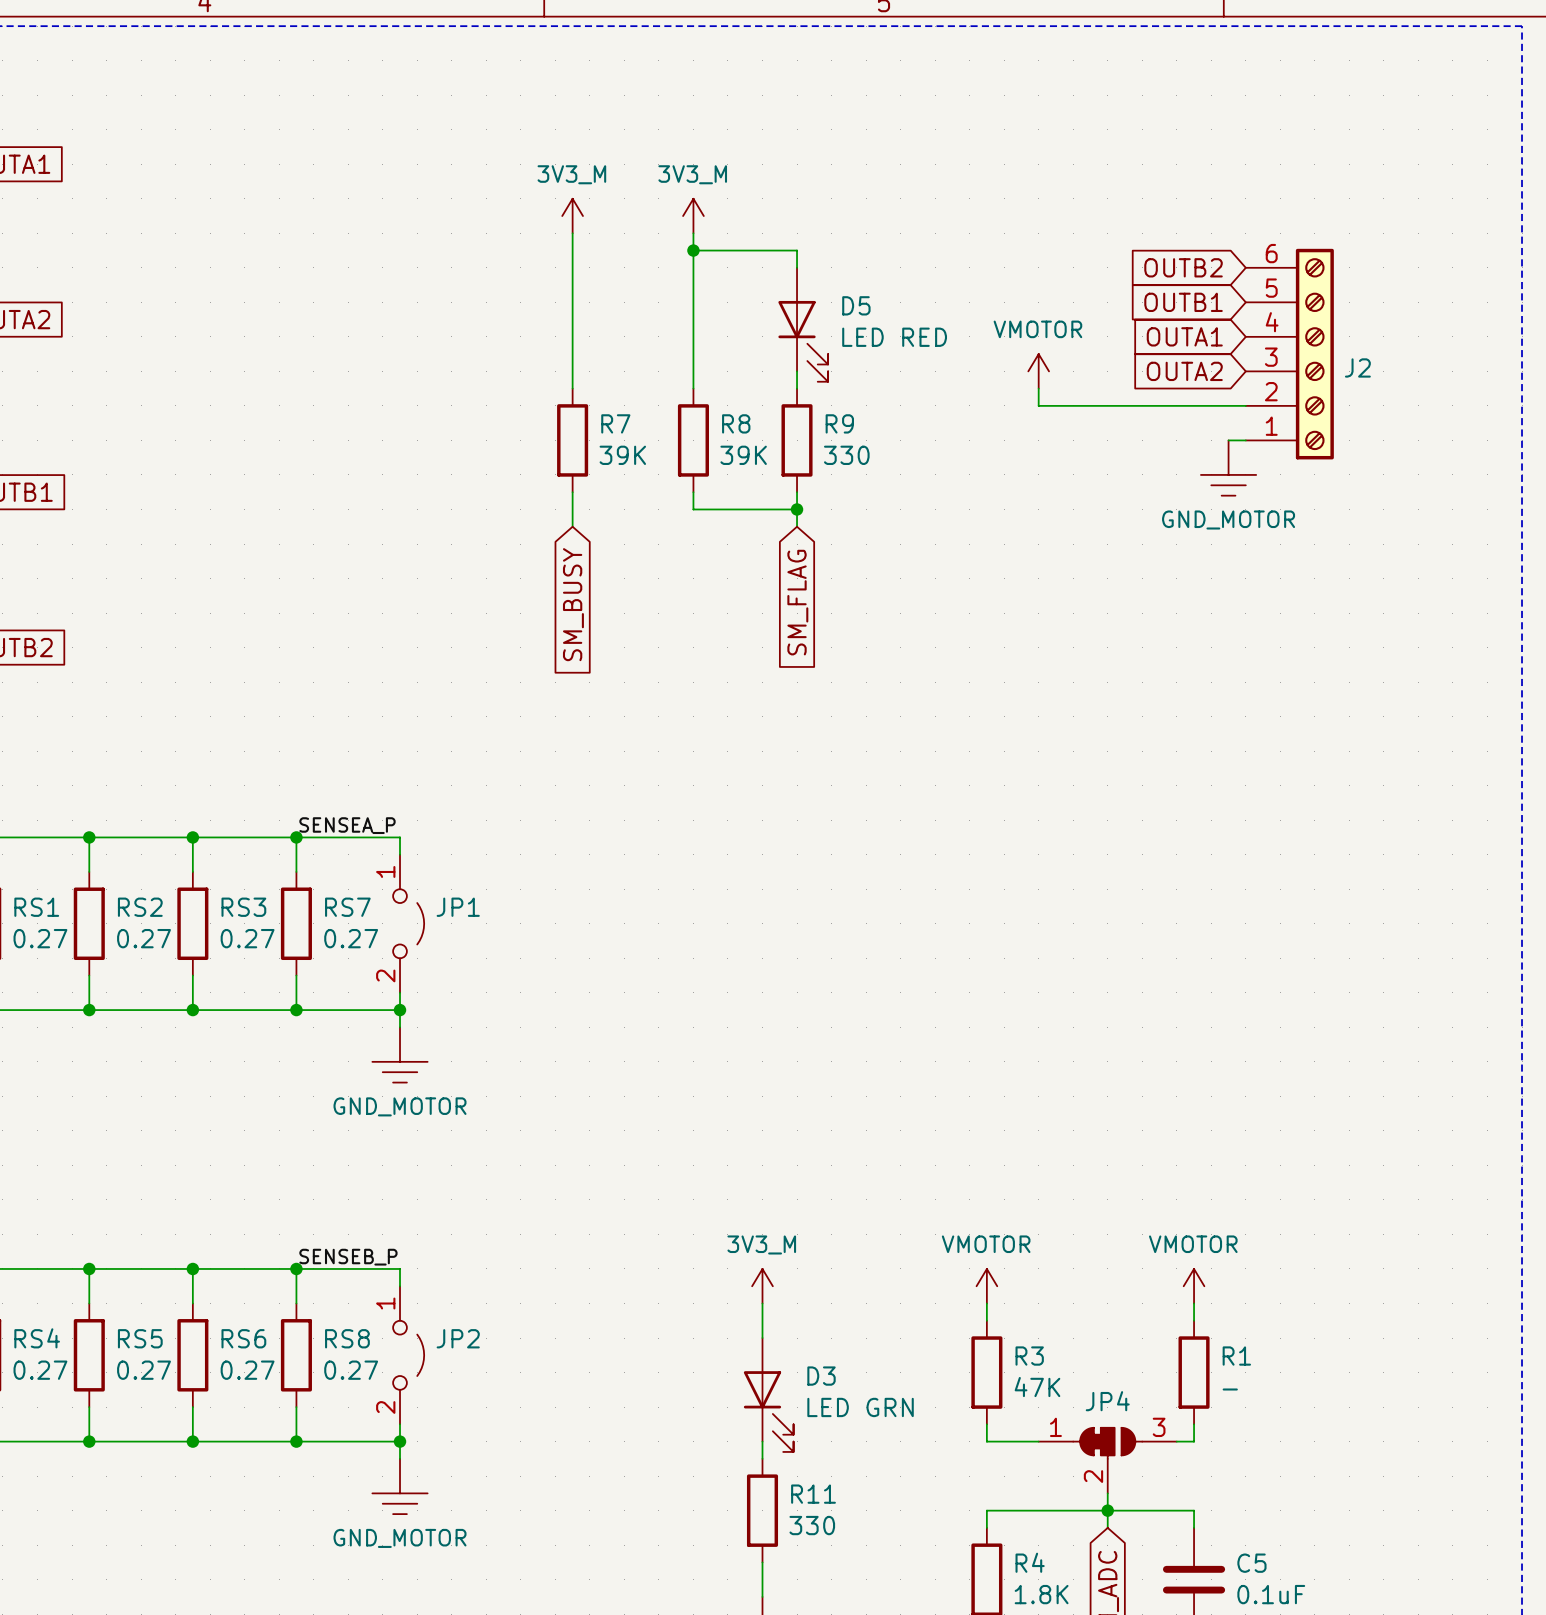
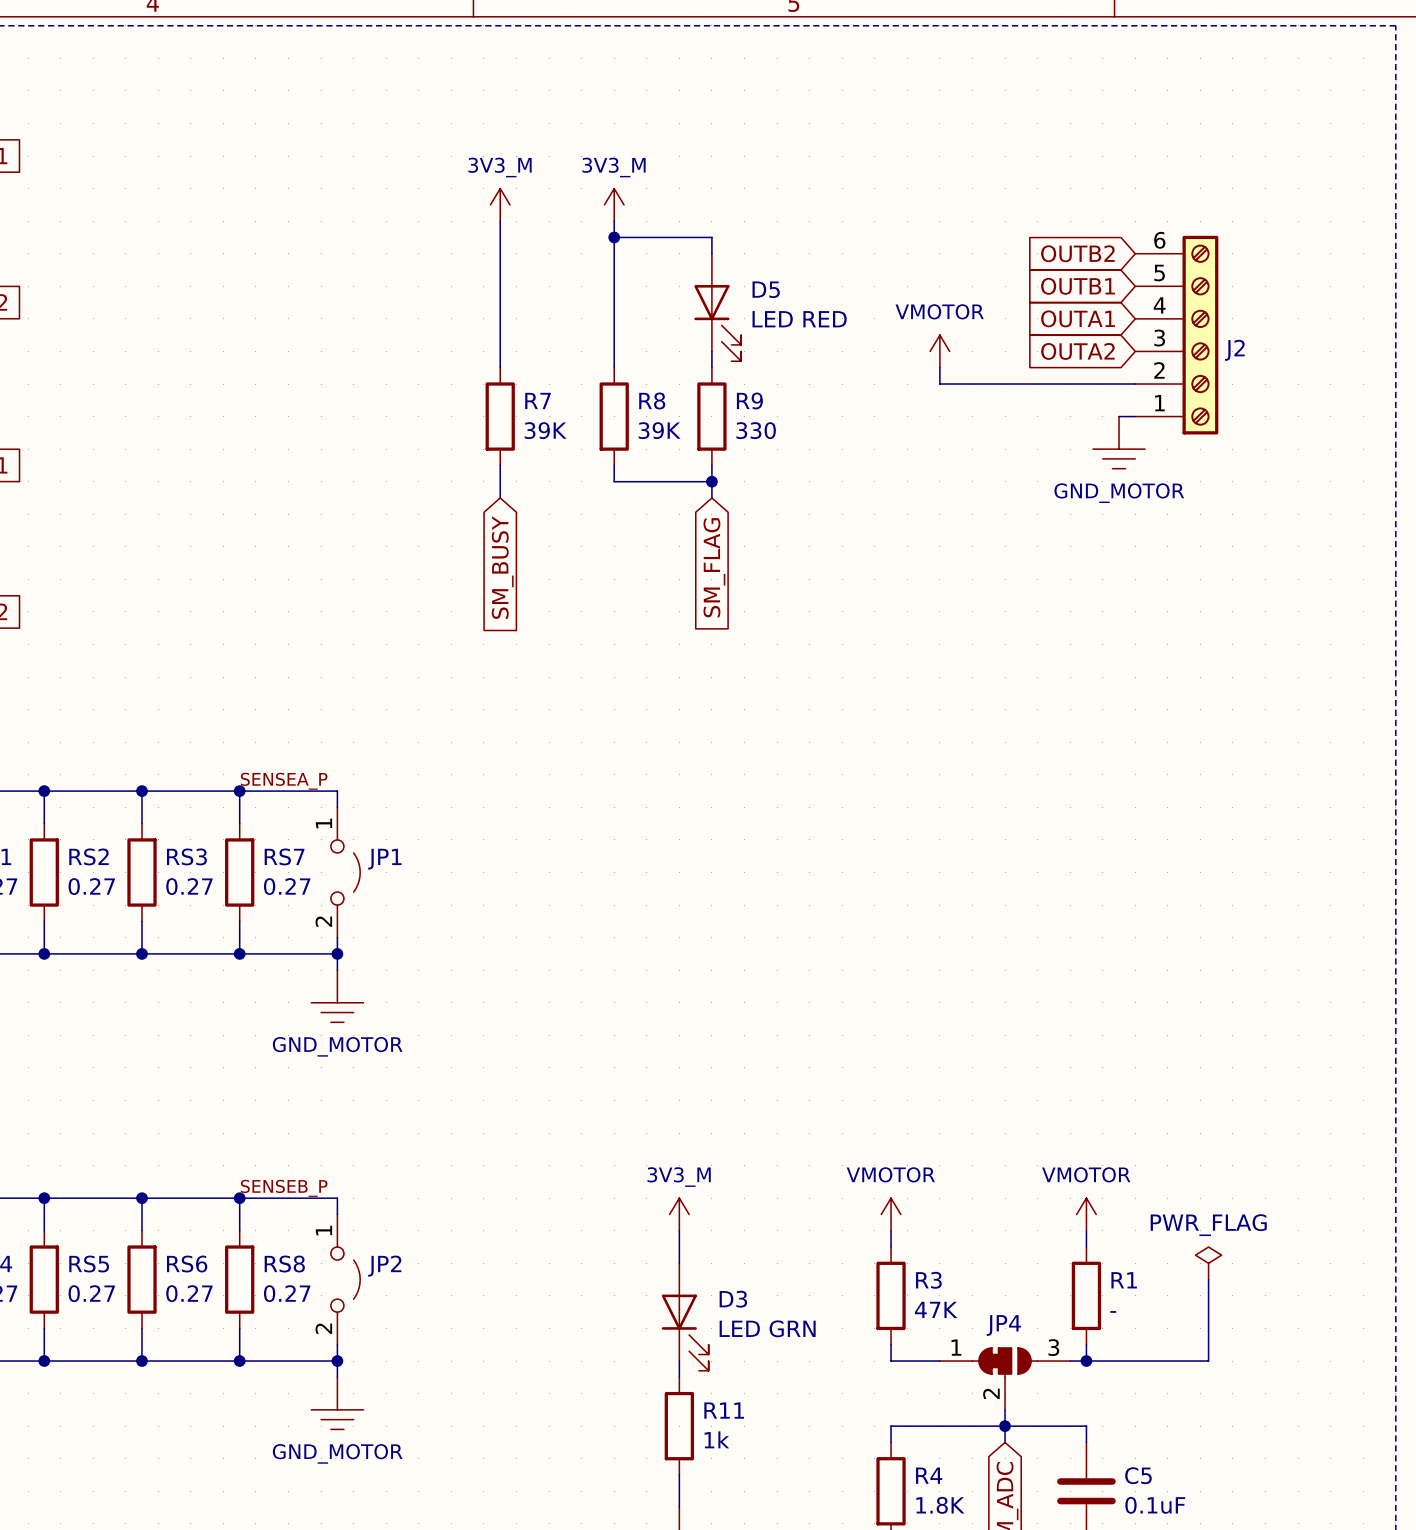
power symbol: none -> PWR_FLAG (1208, 1263)
wire: none -> (1208, 1279) (1208, 1361) (1086, 1361)
junction: none -> (1086, 1361)
R11 value: 330 (812, 1525) -> 1k (716, 1439)

